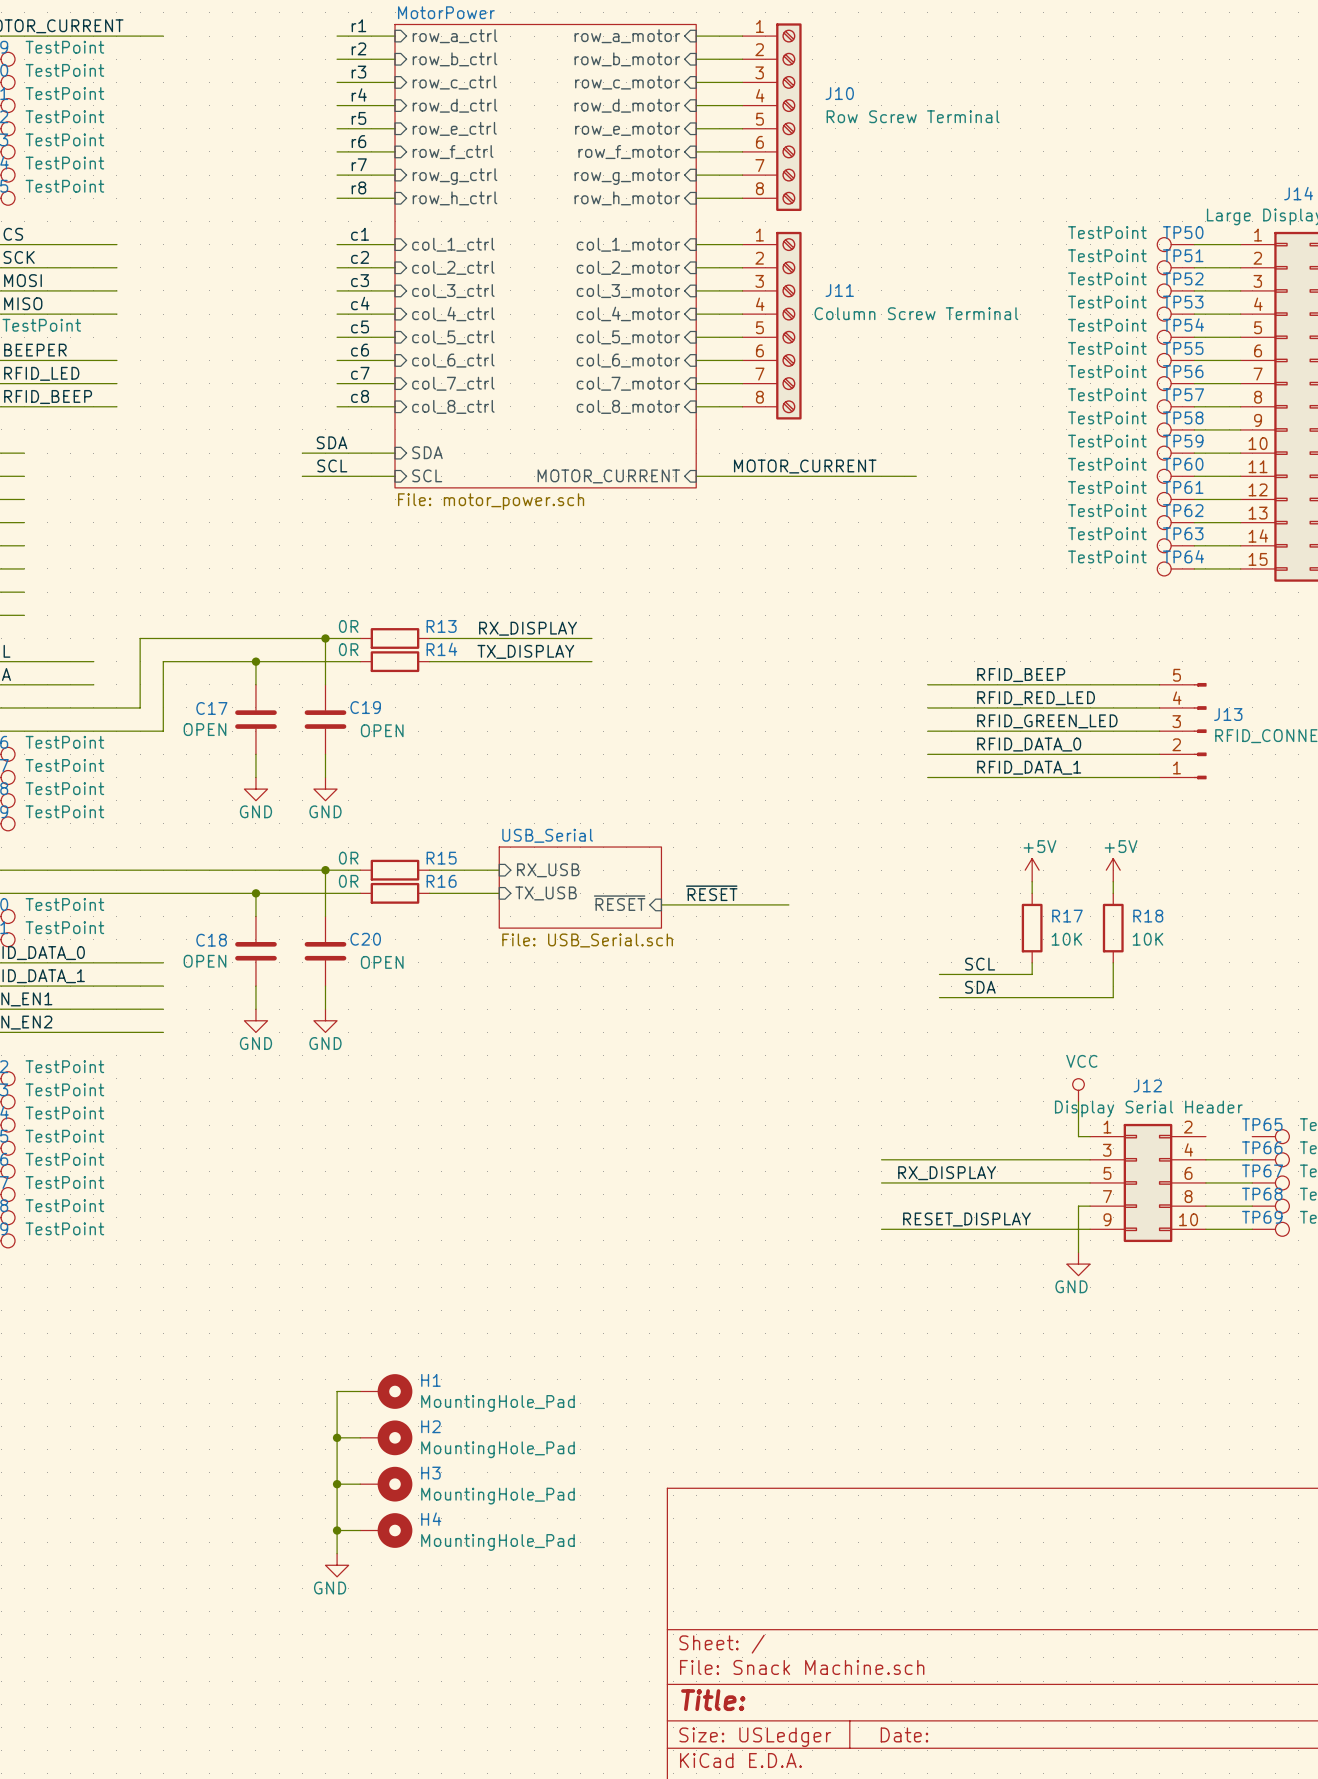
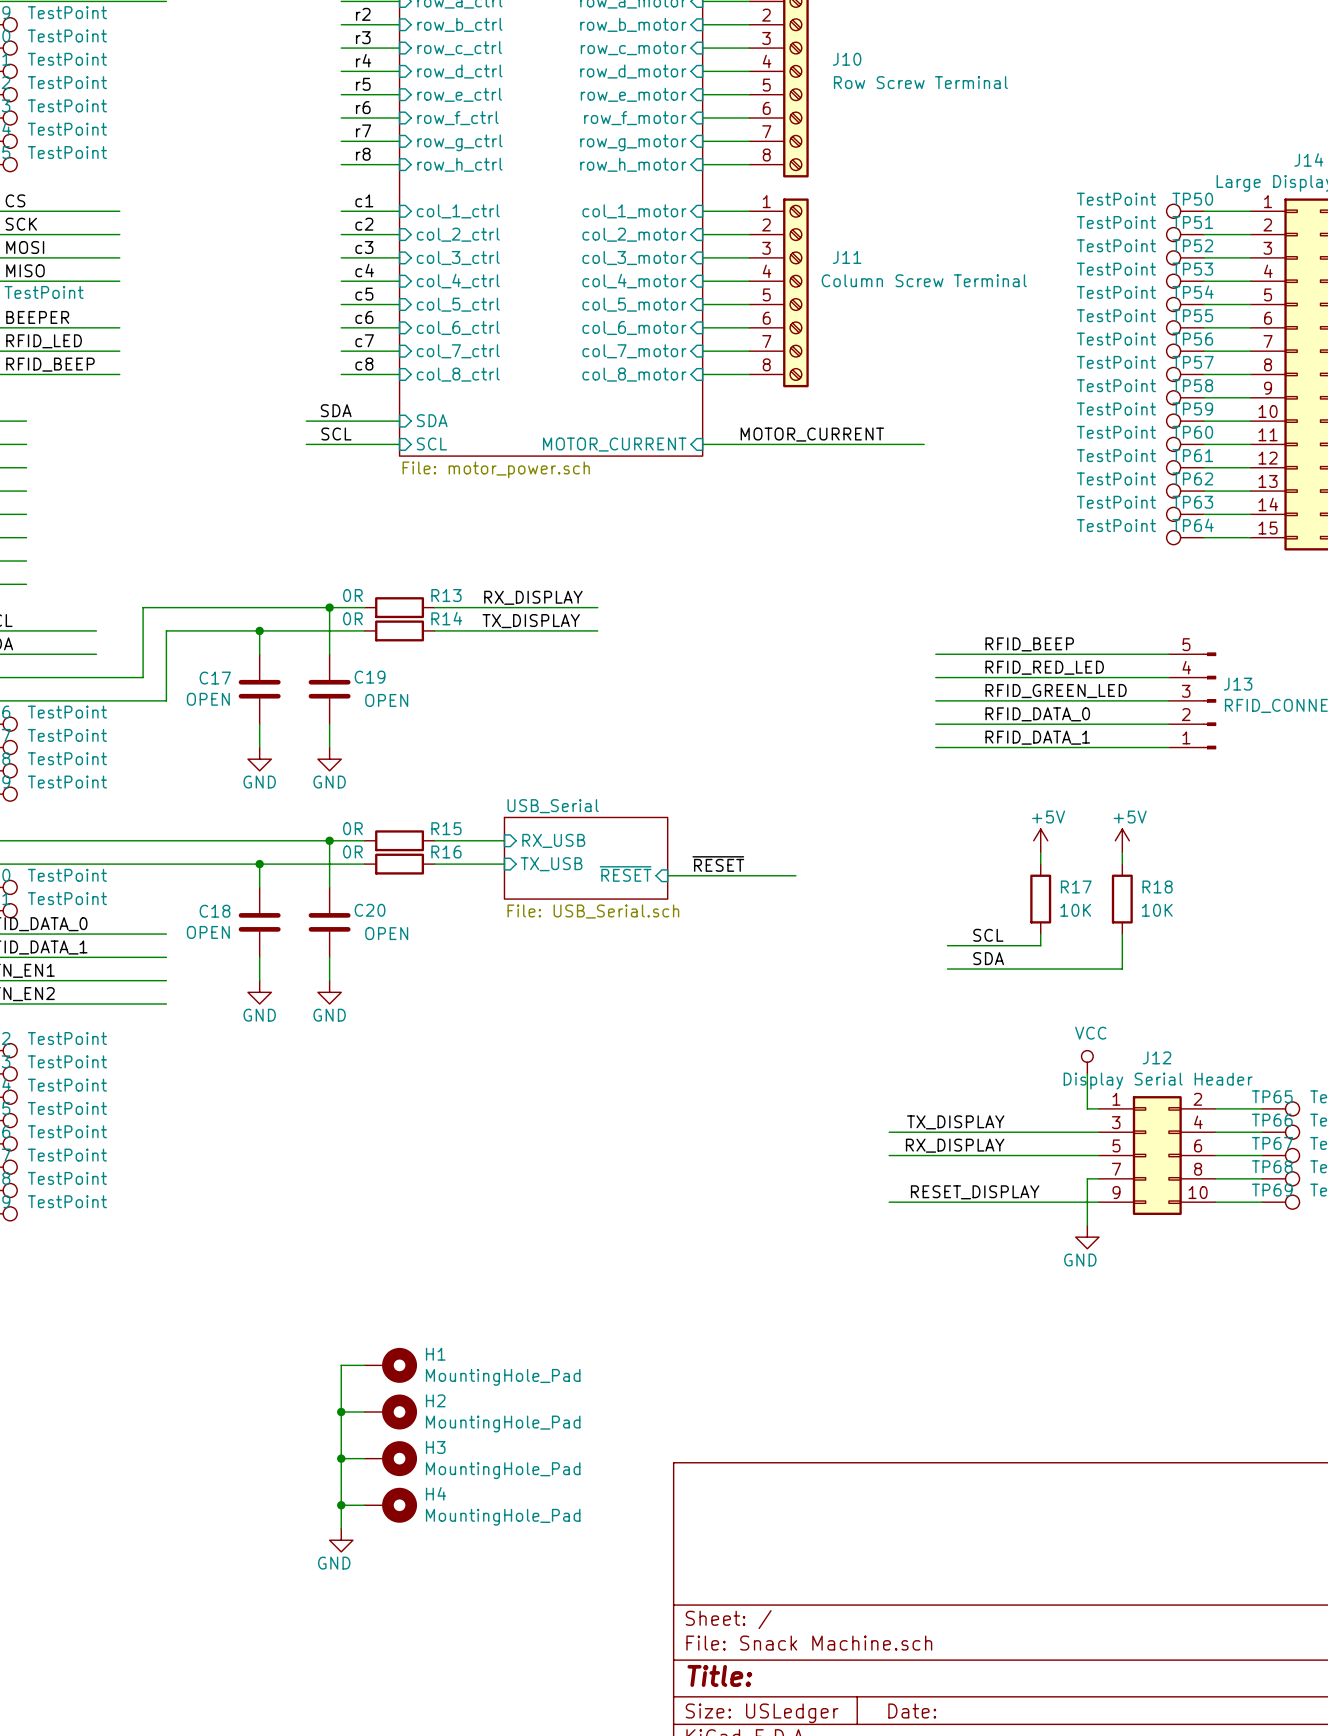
wire: none -> (1215, 1108) (1262, 1108)
label: none -> TX_DISPLAY (955, 1122)

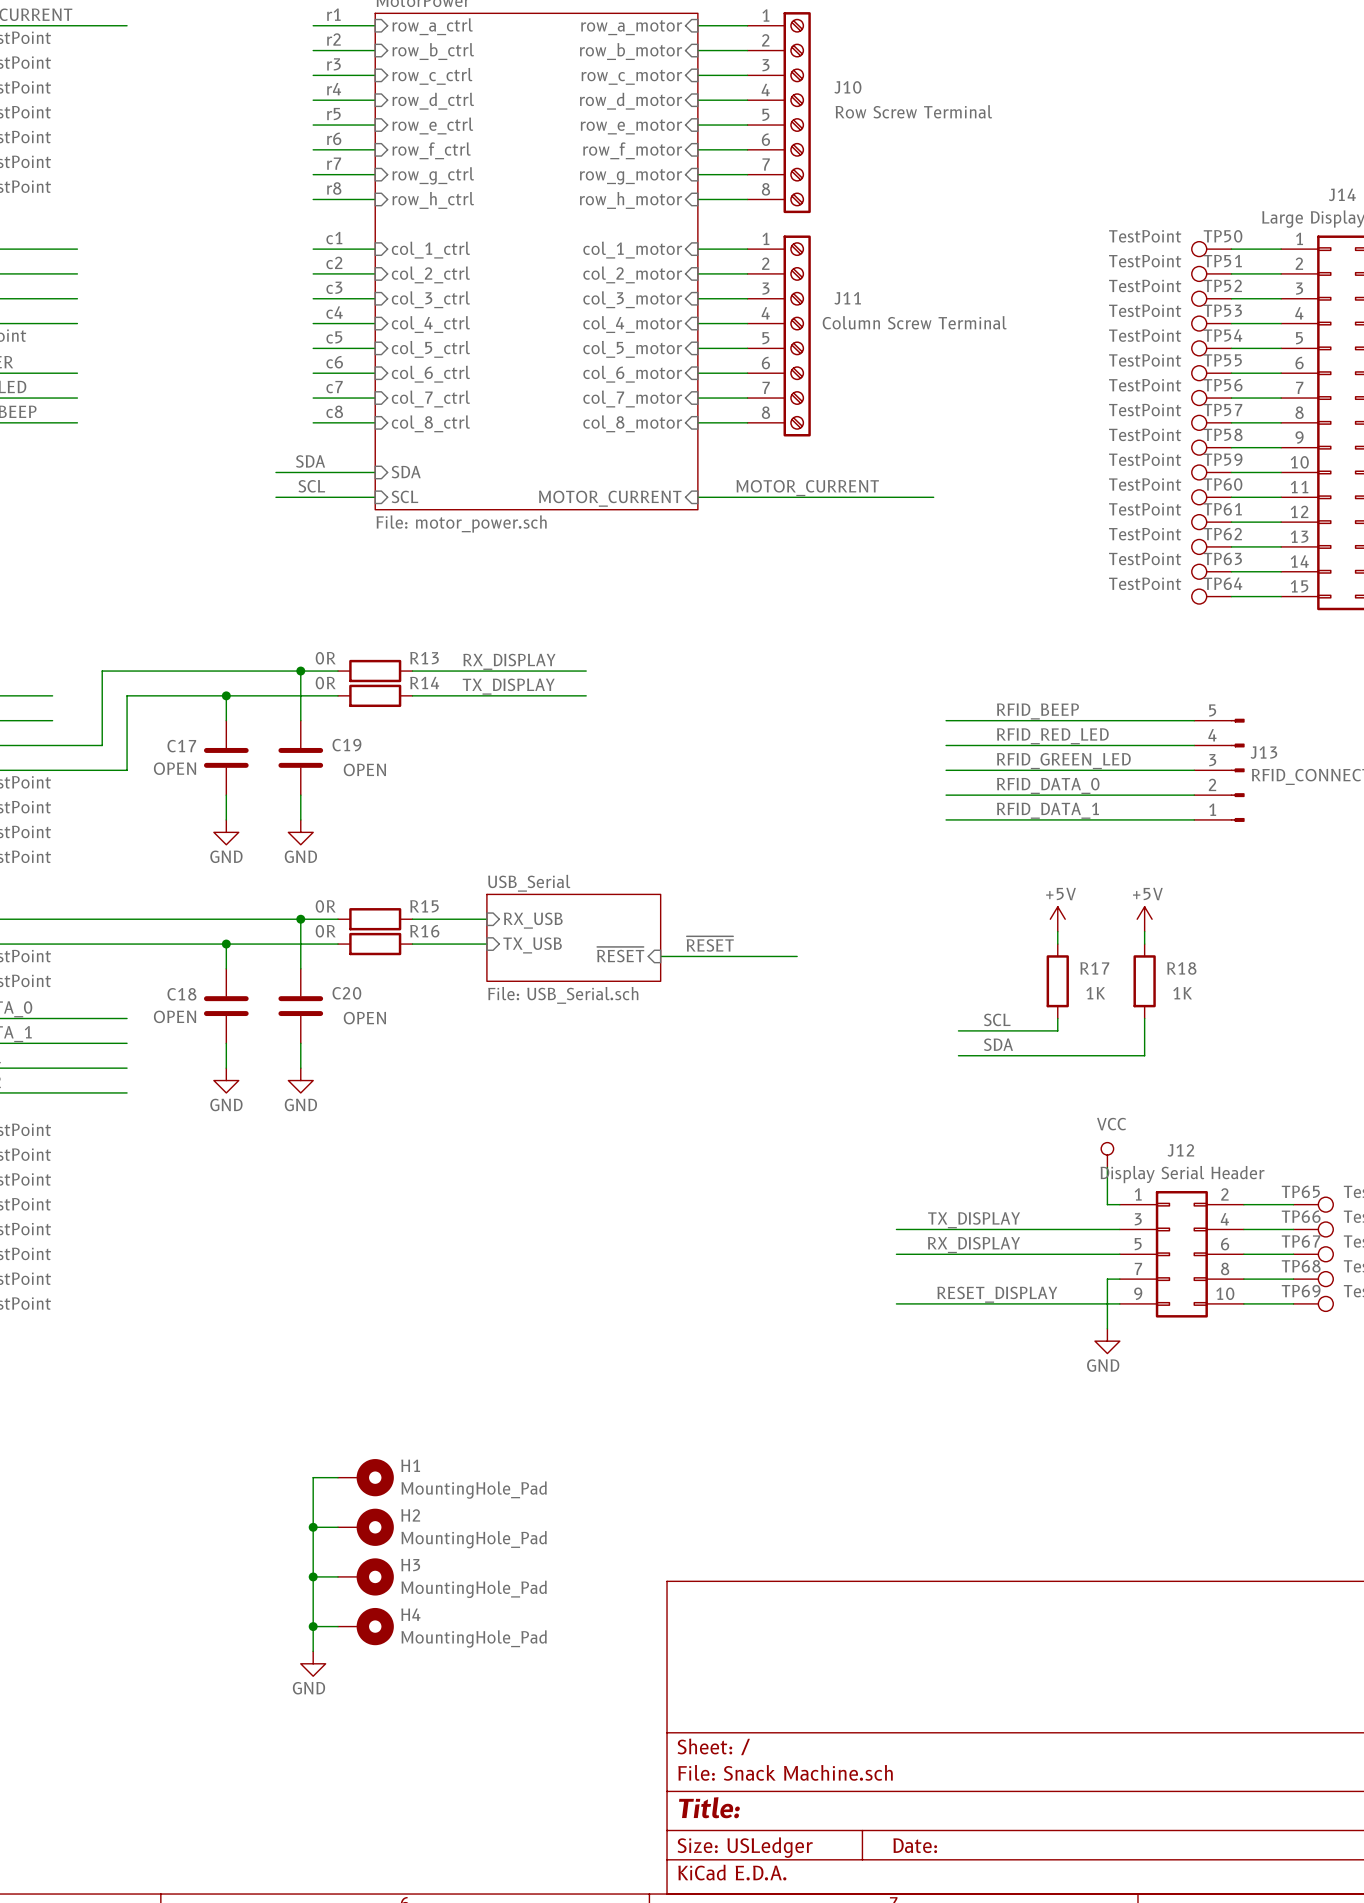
R17 value: 10K (1075, 910) -> 1K (1095, 993)
R18 value: 10K (1157, 910) -> 1K (1182, 993)

